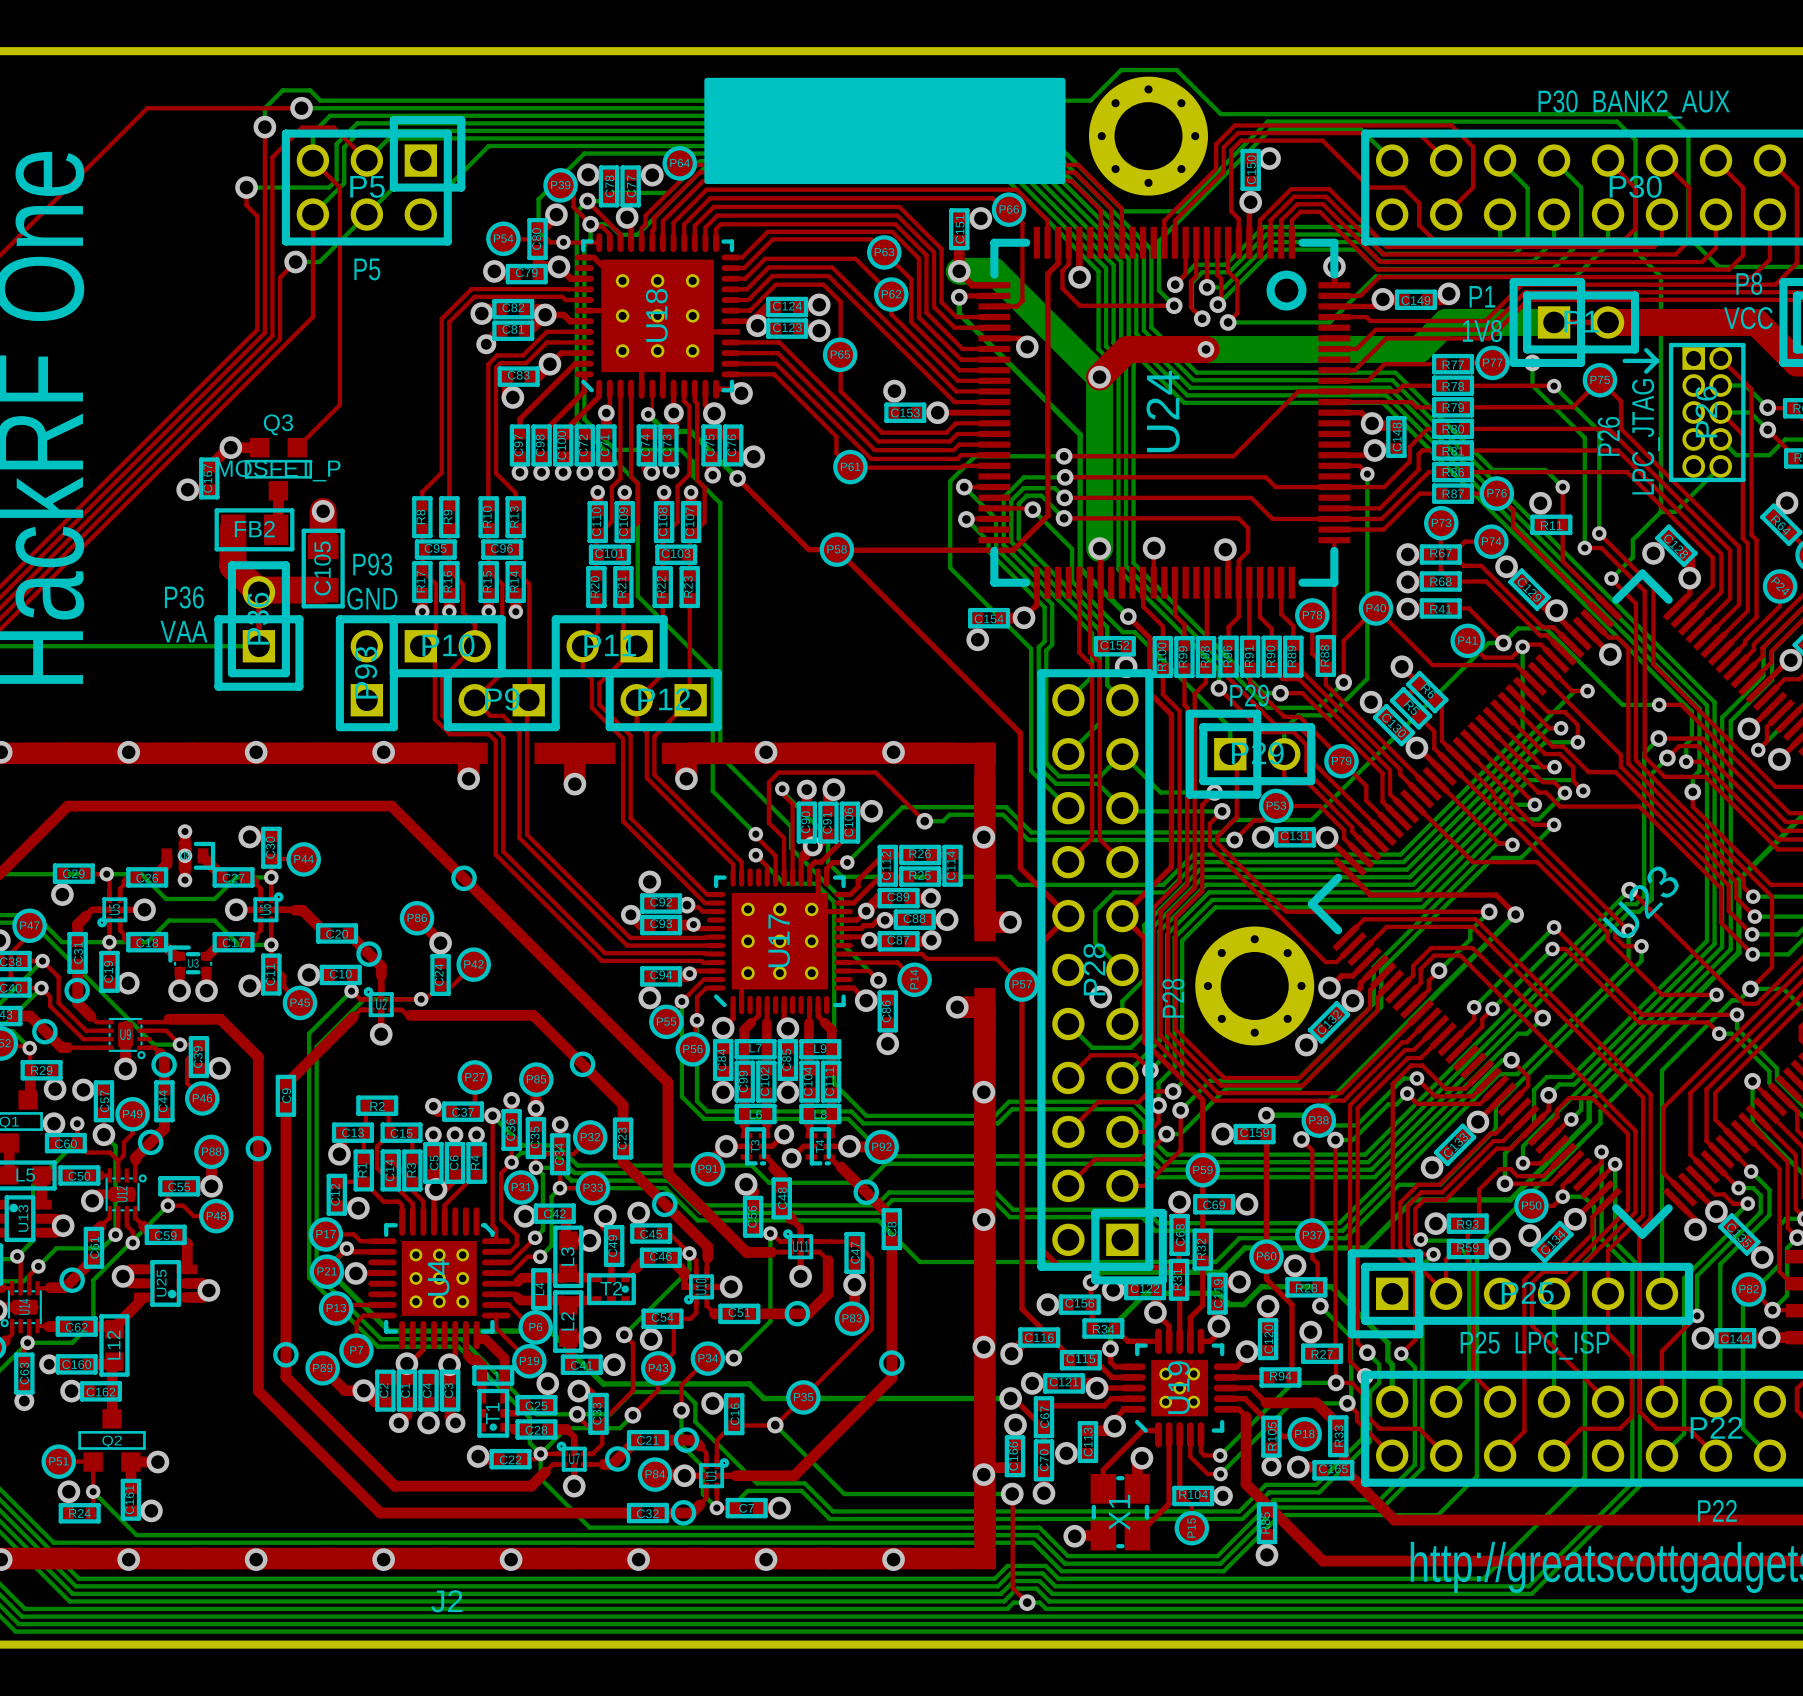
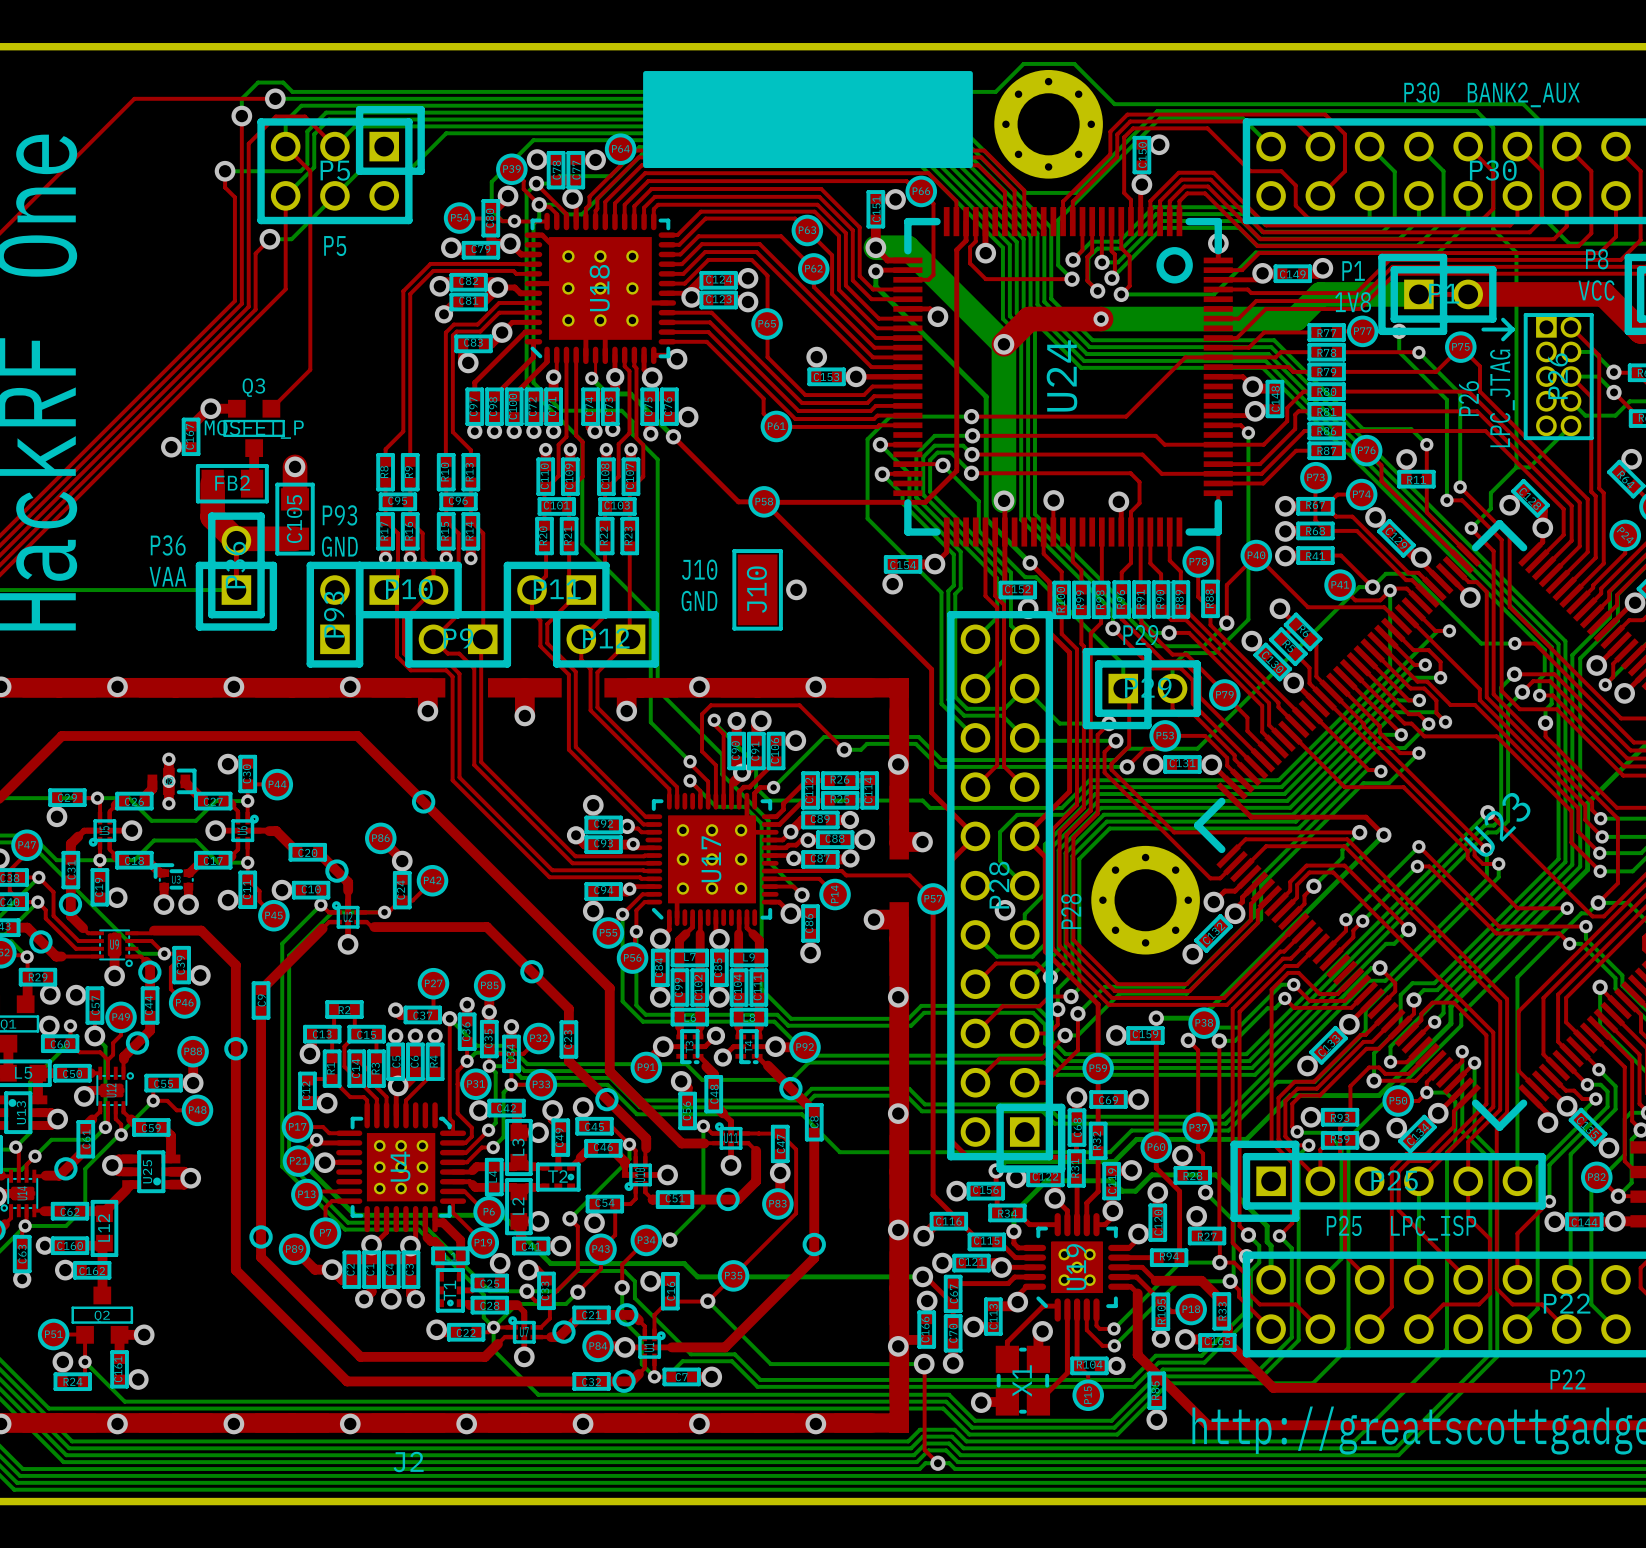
text: none -> J10 (699, 569)
J10: none -> (757, 589)
via: none -> (796, 589)
text: none -> GND (699, 601)

